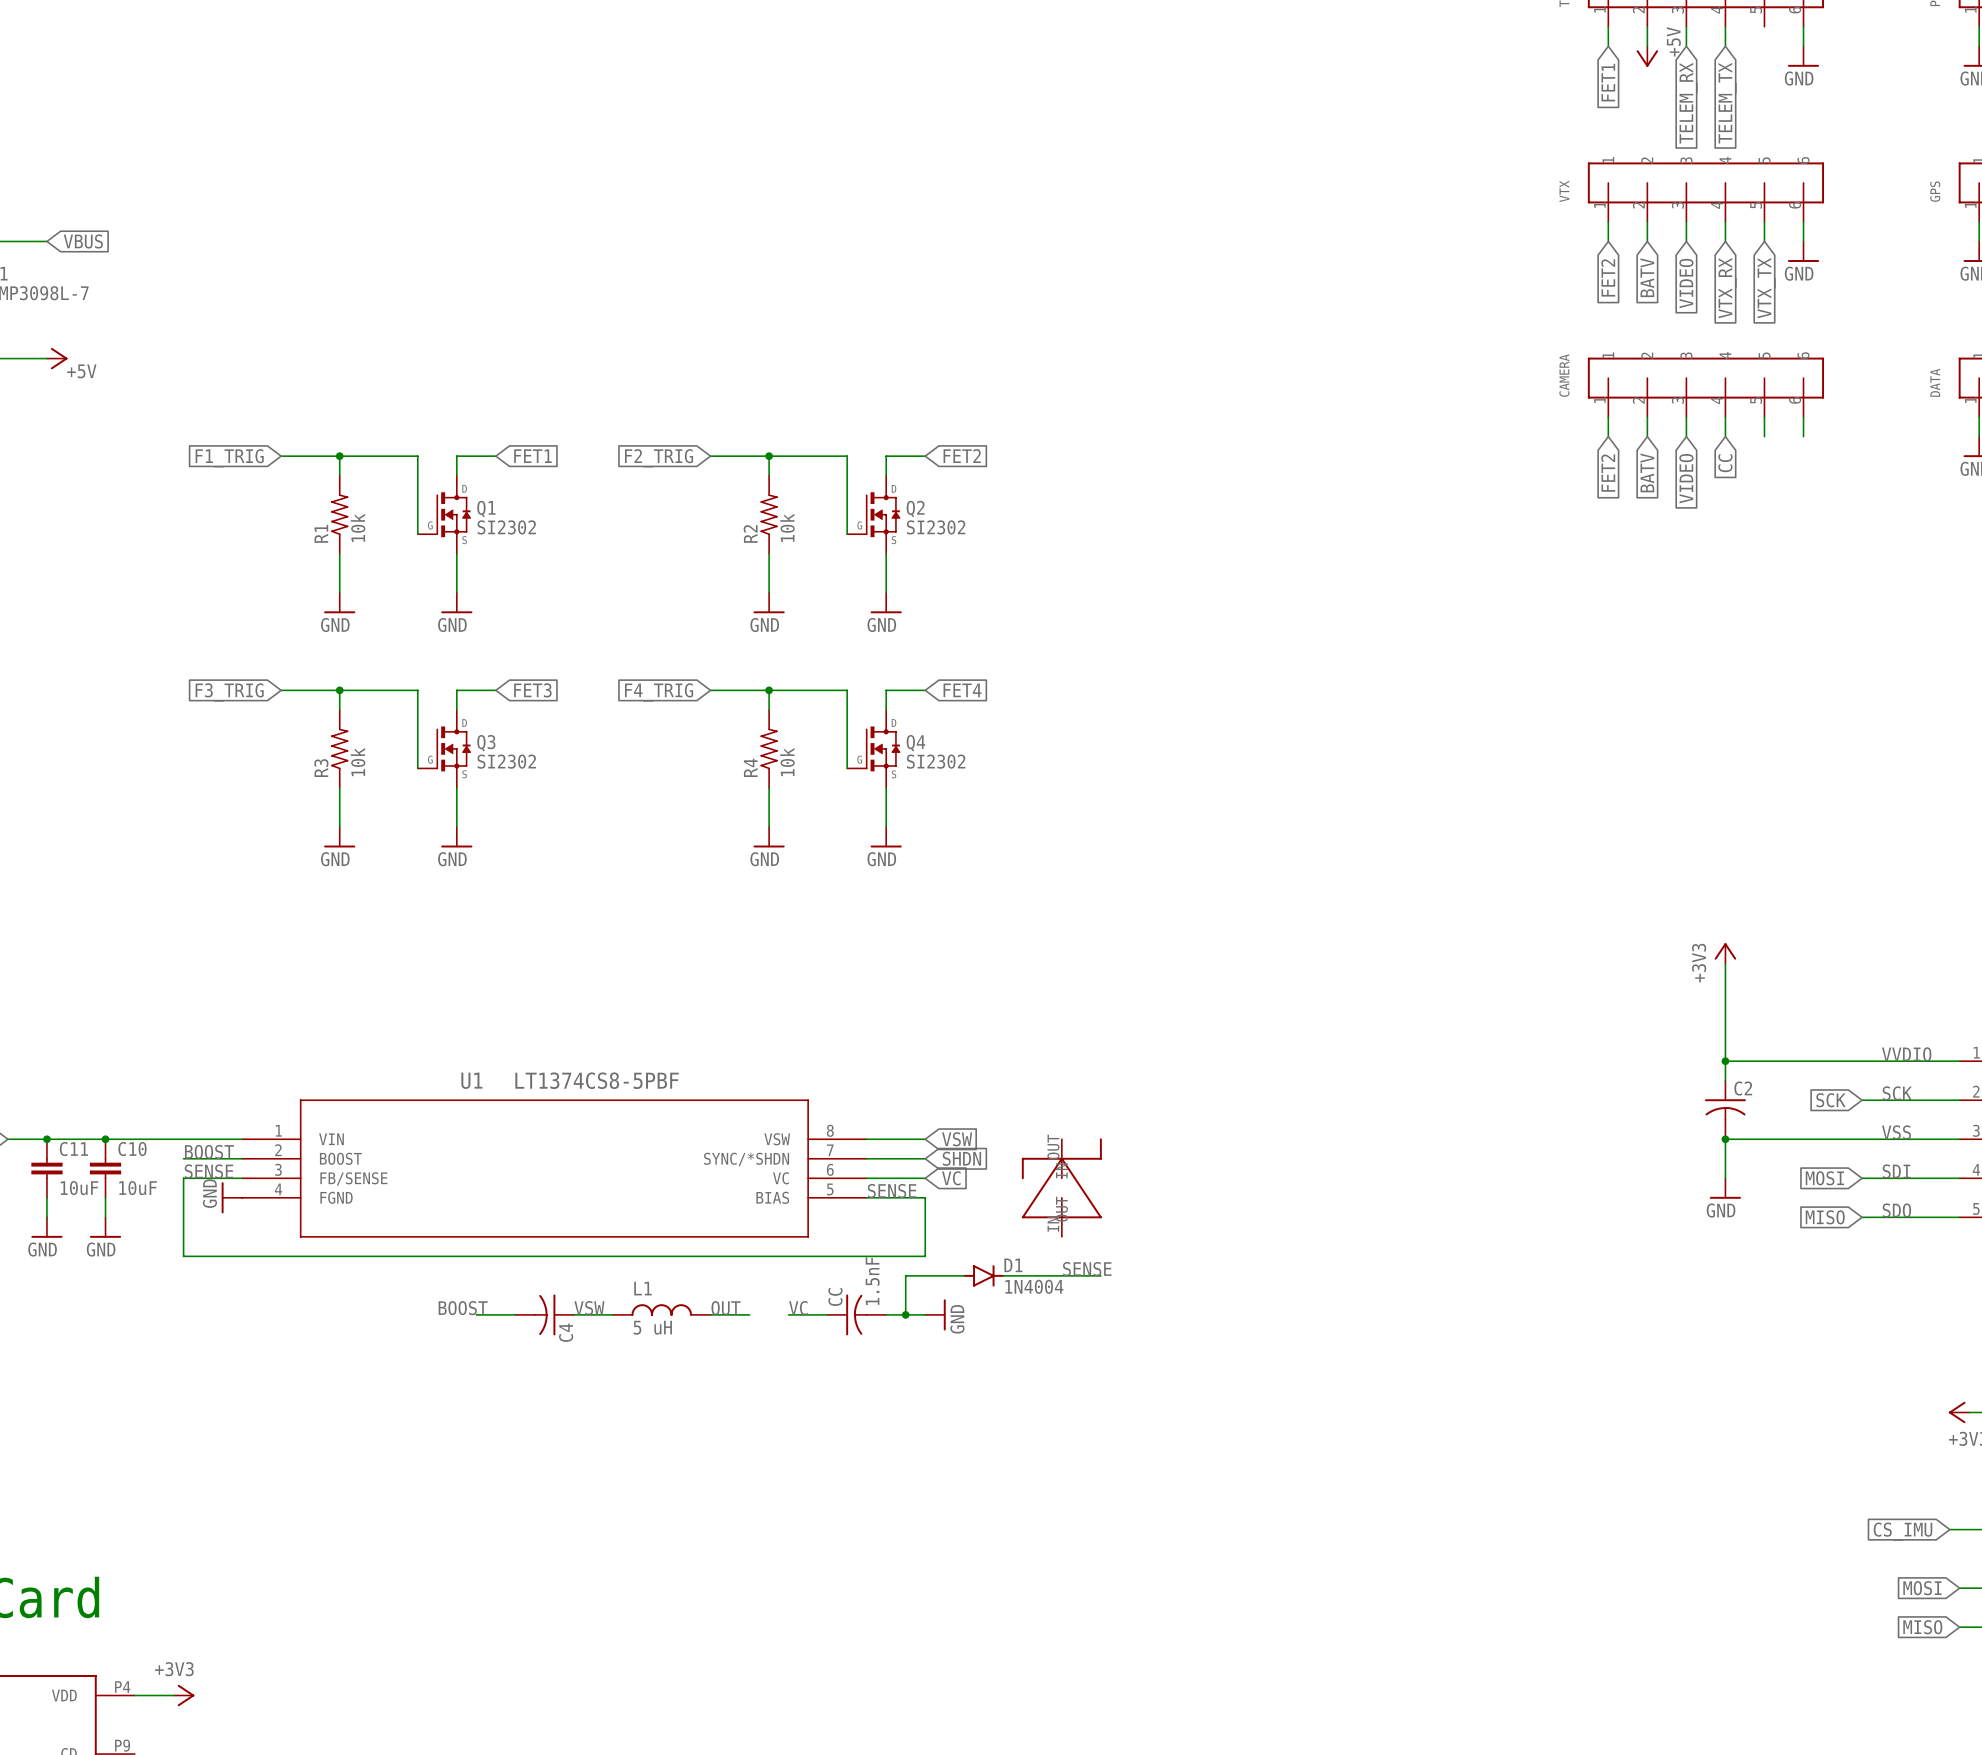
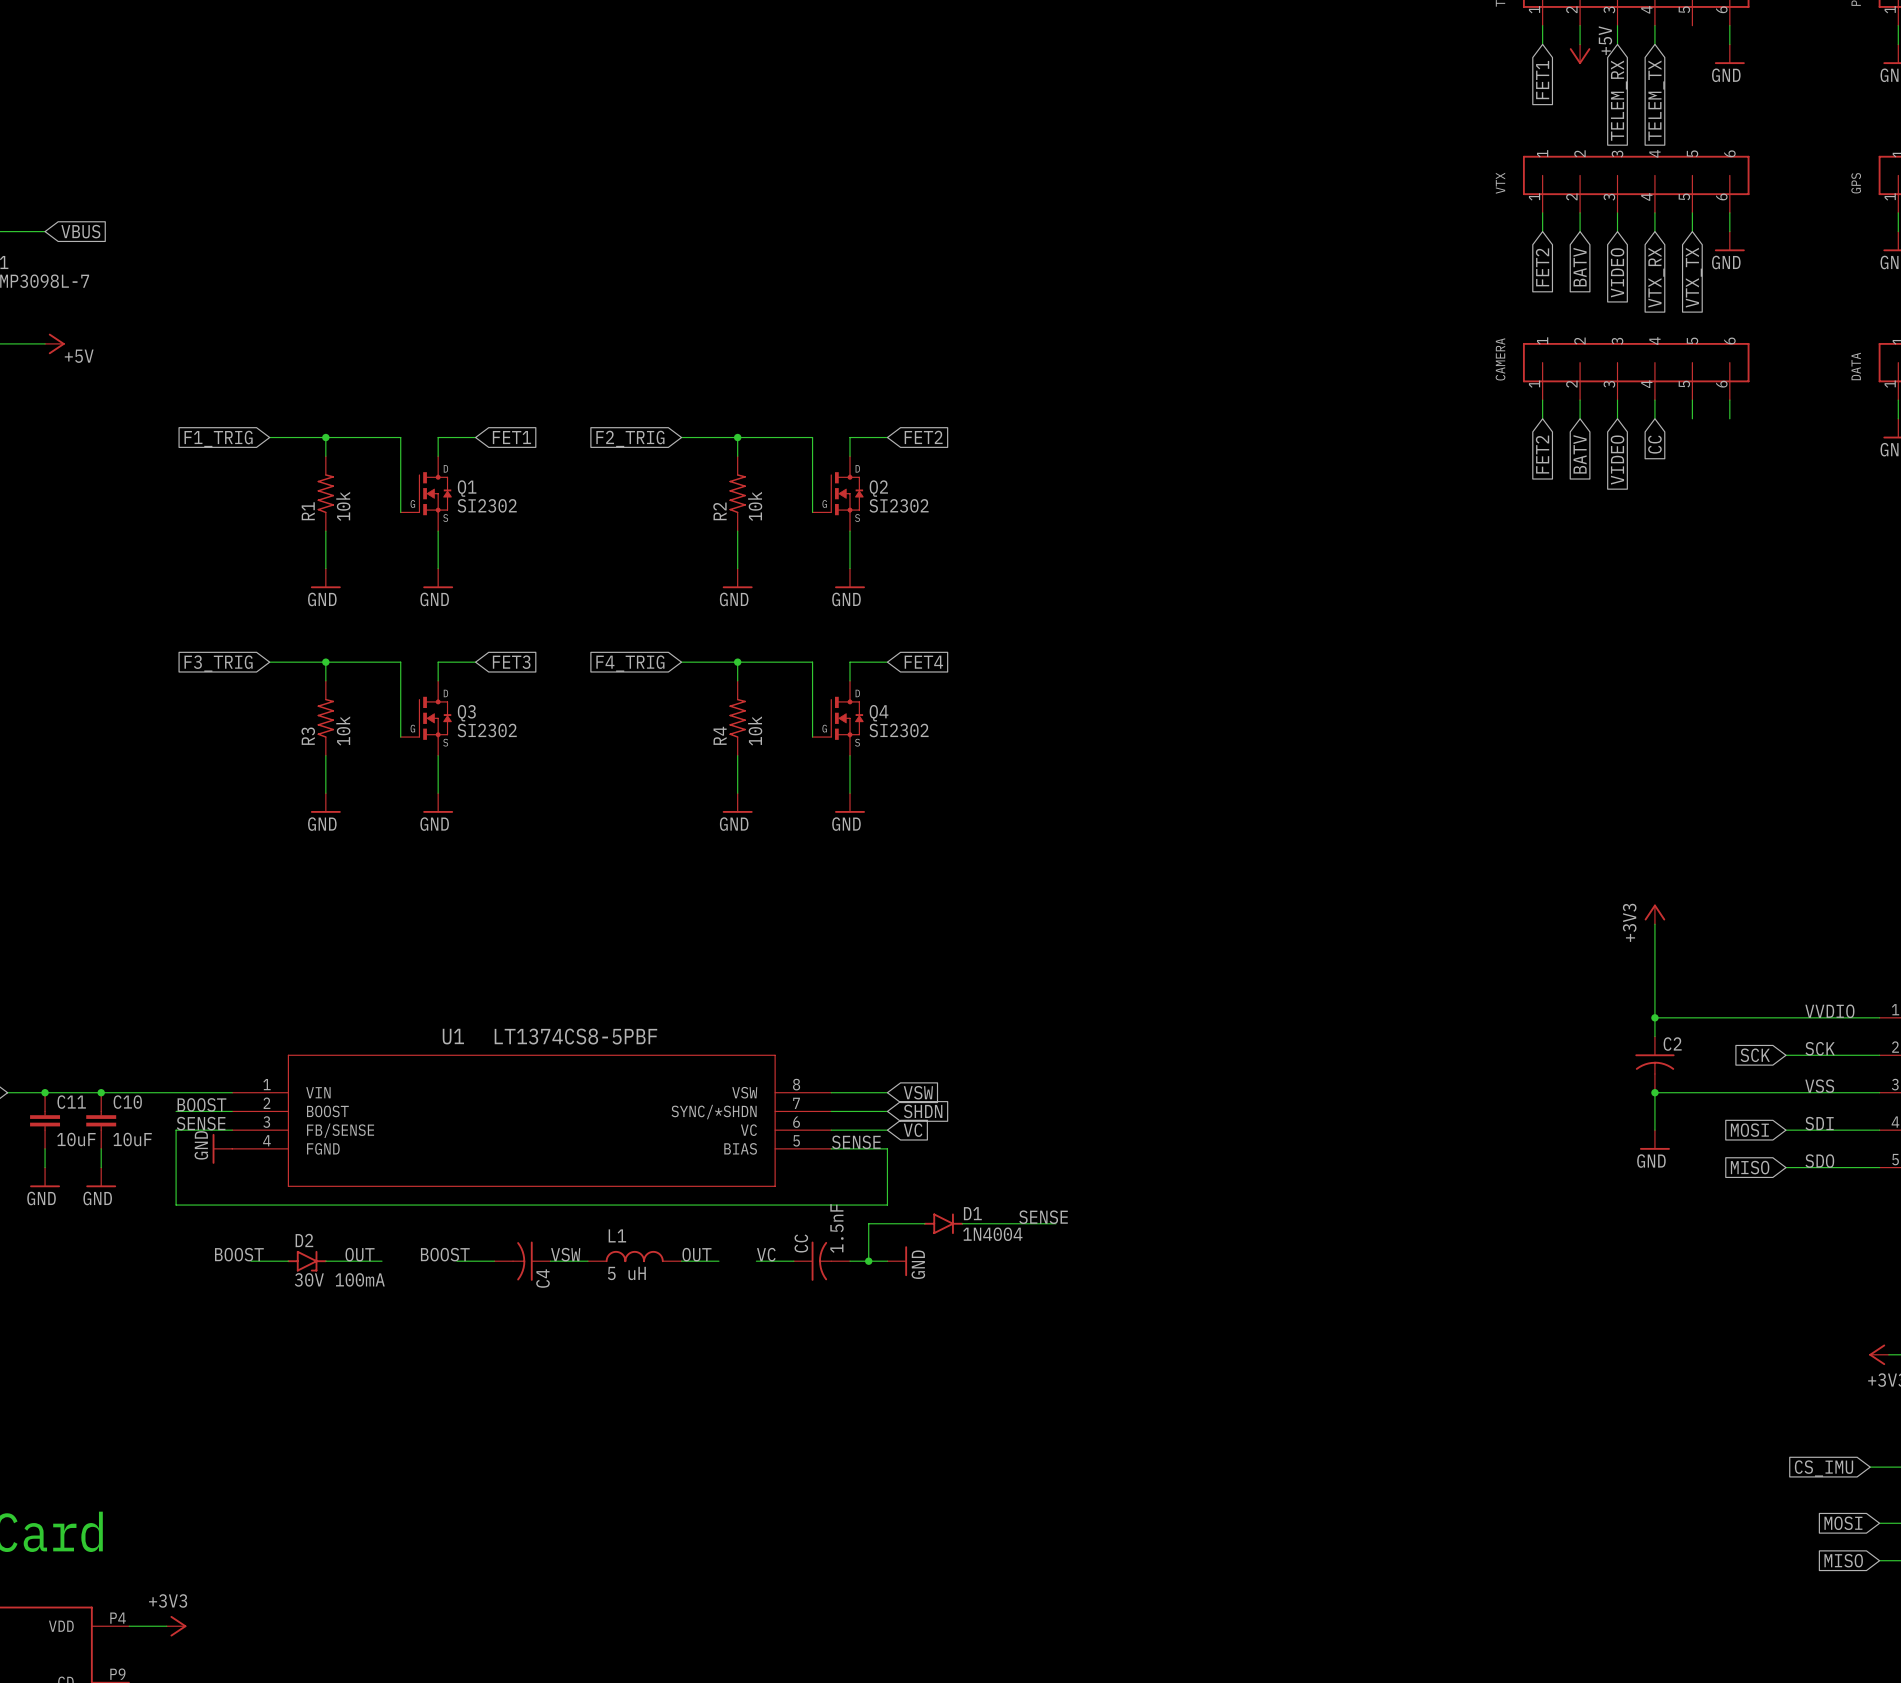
part: (1061, 1187) -> none
label: none -> BOOST (239, 1254)
label: none -> OUT (360, 1254)
wire: none -> (250, 1261) (288, 1261)
D2: none -> 30V 100mA (307, 1261)
wire: none -> (325, 1261) (382, 1261)

